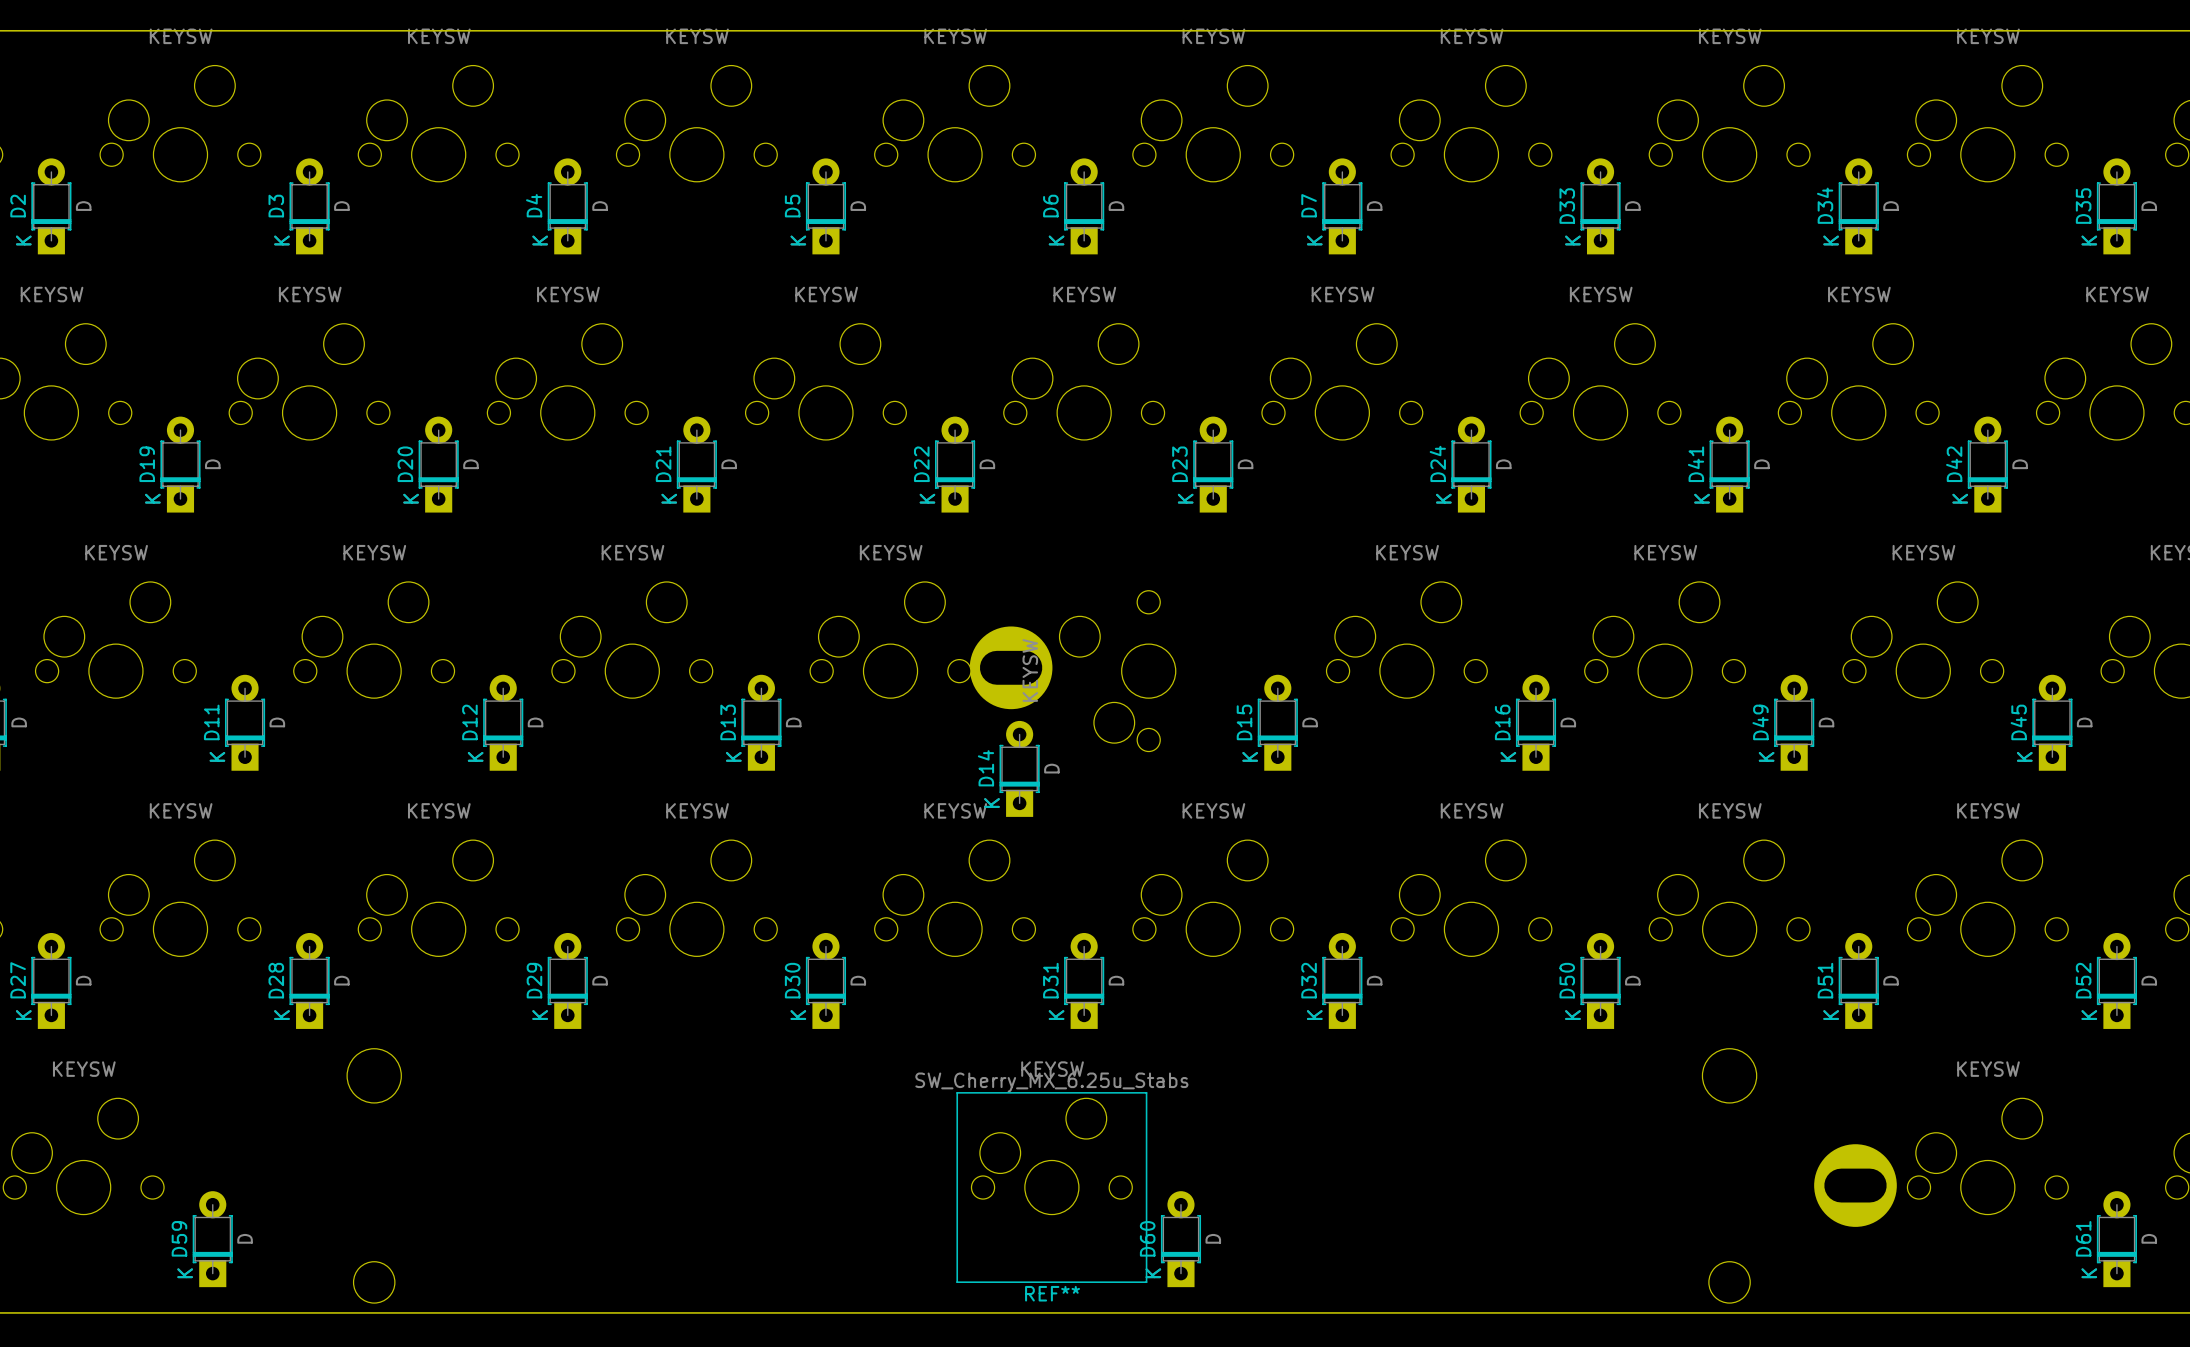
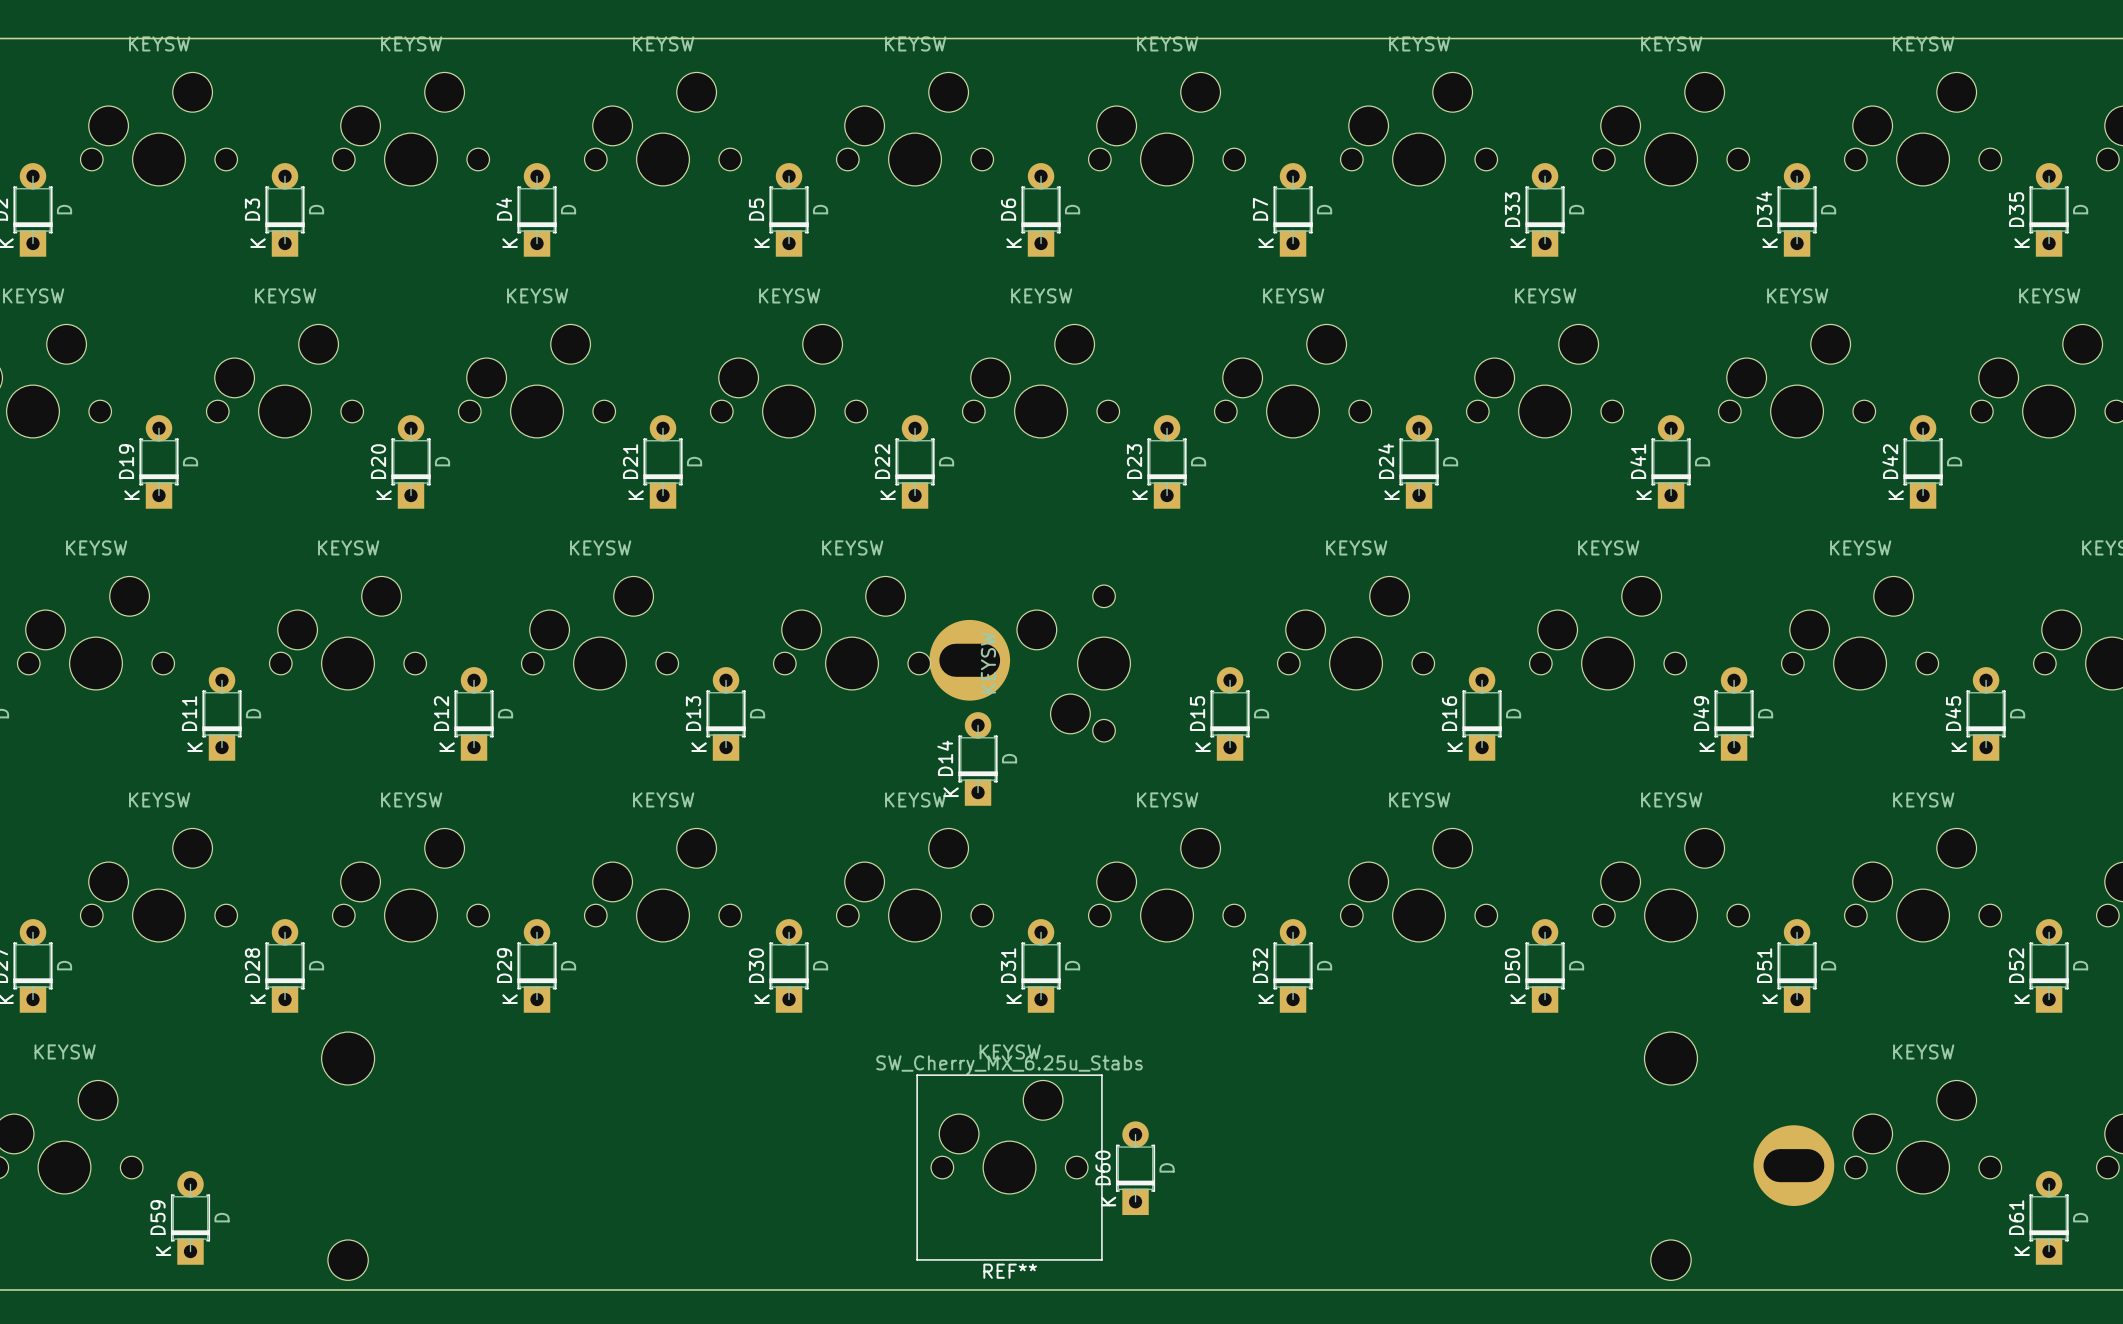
D60 position: (1180, 1239) -> (1135, 1168)

